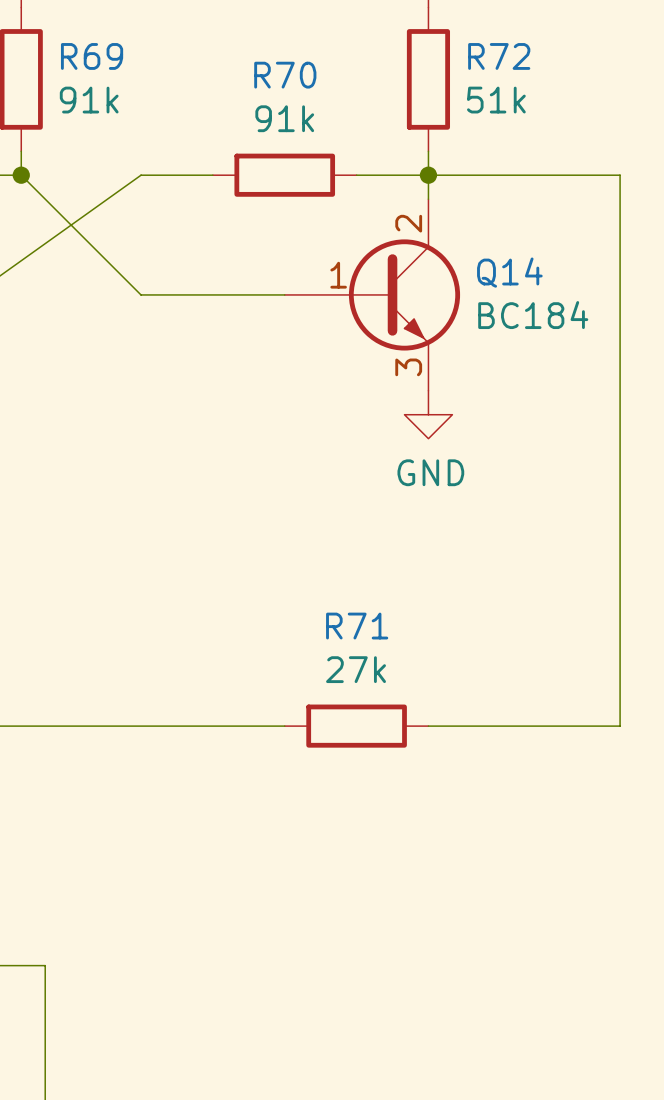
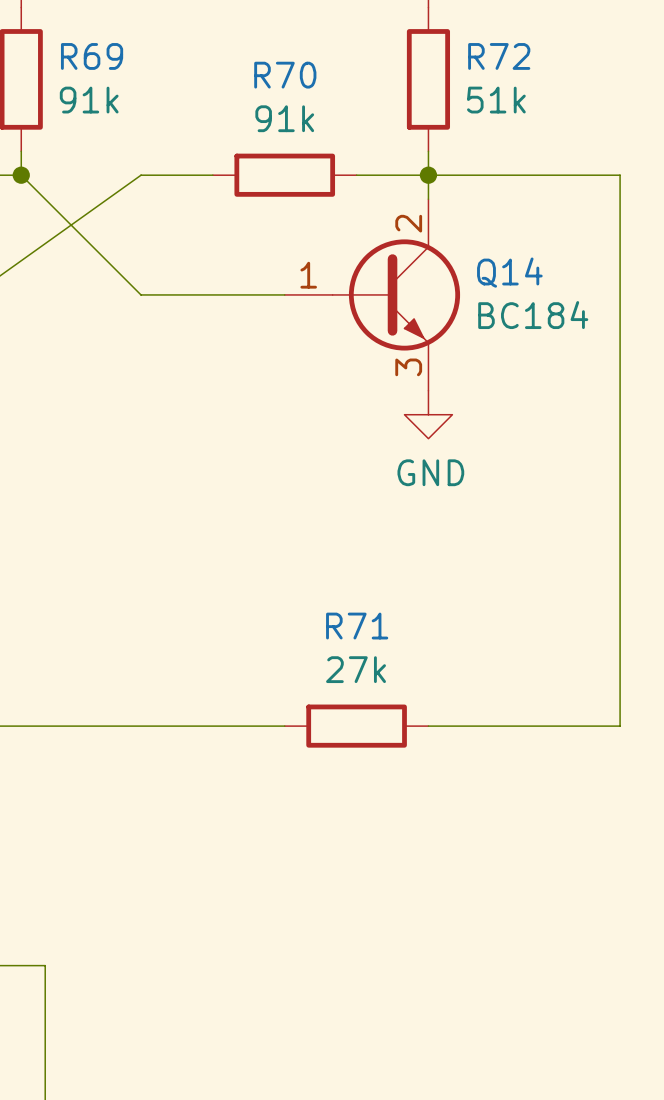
Q14 symbol: [284, 199, 461, 391] -> [284, 199, 461, 391]

